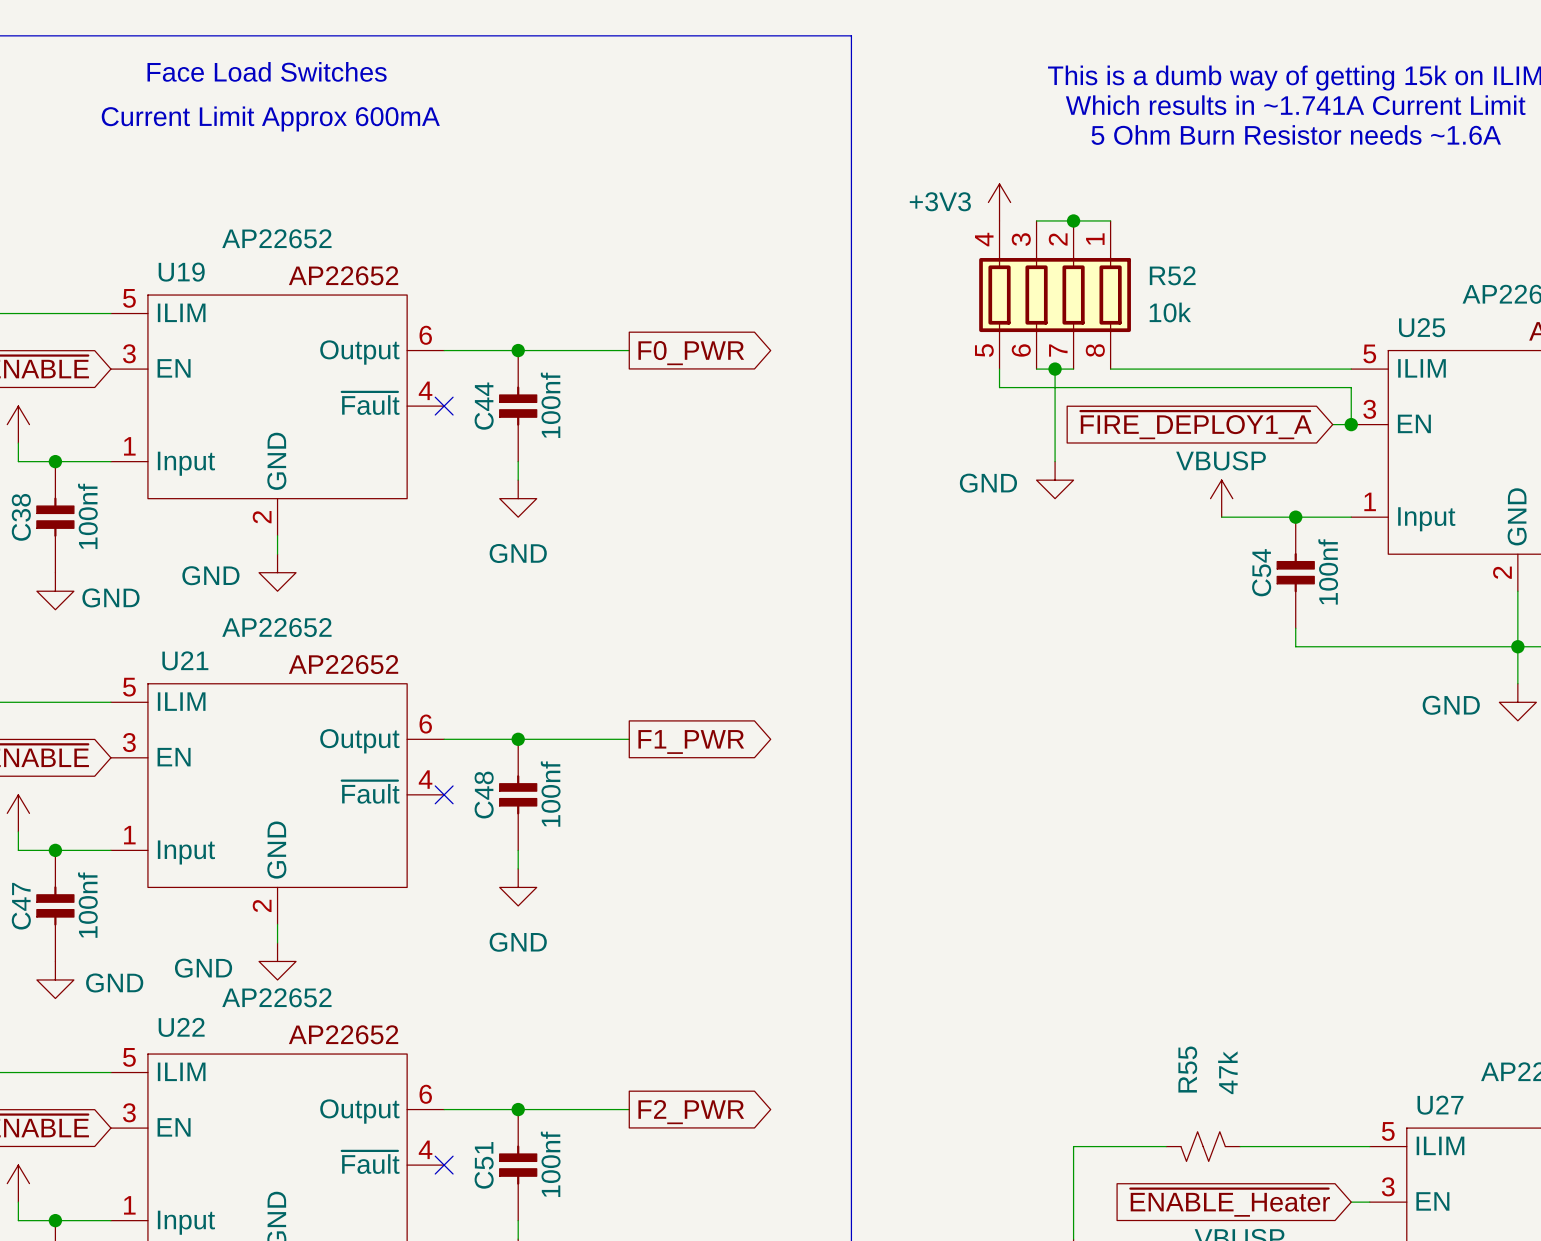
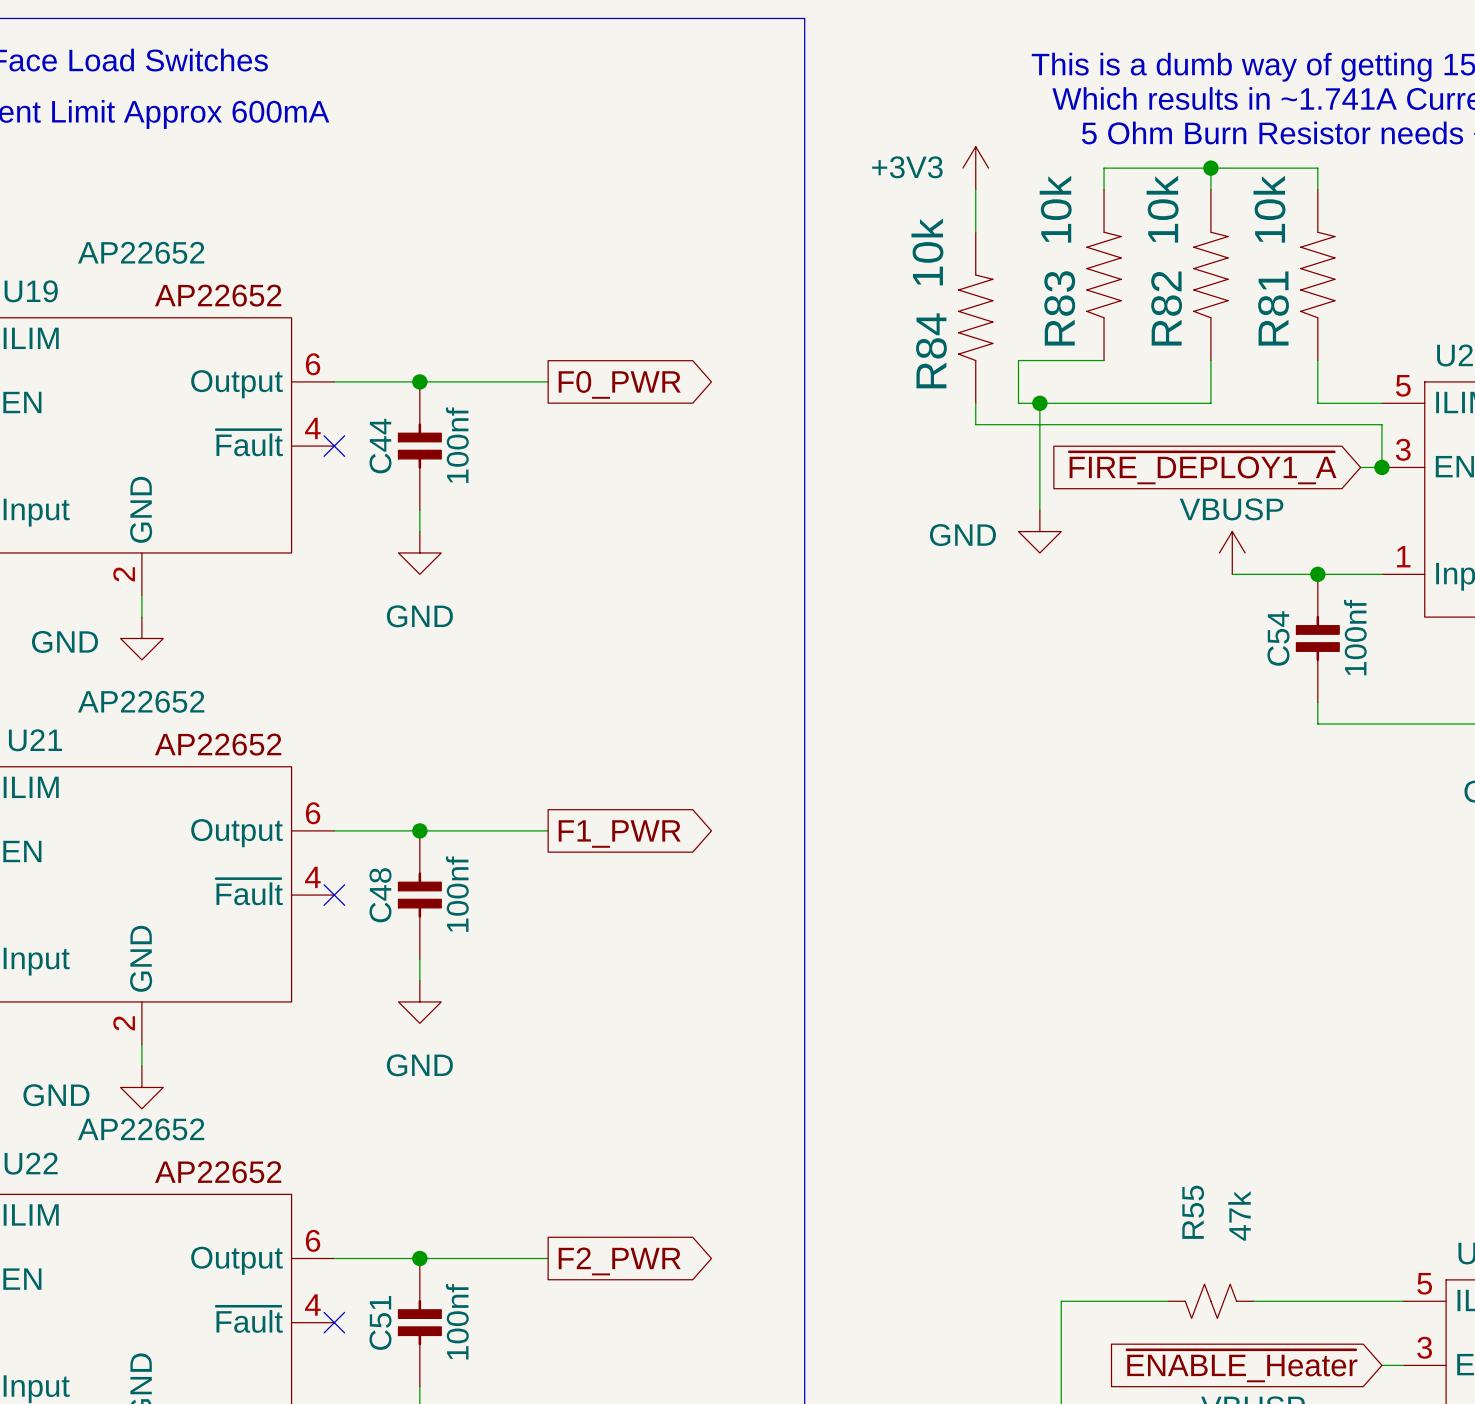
wire: none -> (1210, 168) (1210, 189)
junction: none -> (1210, 168)
wire: none -> (1104, 189) (1104, 168) (1317, 168) (1317, 189)
power symbol position: +3V3 (999, 202) -> +3V3 (975, 168)
wire: (1036, 220) (1110, 220) -> none
junction: (1073, 220) -> none
R83: none -> 10k (1104, 275)
R82: none -> 10k (1210, 275)
R81: none -> 10k (1317, 275)
R84: none -> 10k (975, 317)
R52: 10k (1055, 295) -> none
wire: none -> (1317, 360) (1317, 403)
wire: none -> (1061, 403) (1104, 403)
wire: (1203, 369) (1295, 369) -> (1210, 403) (1210, 360)

